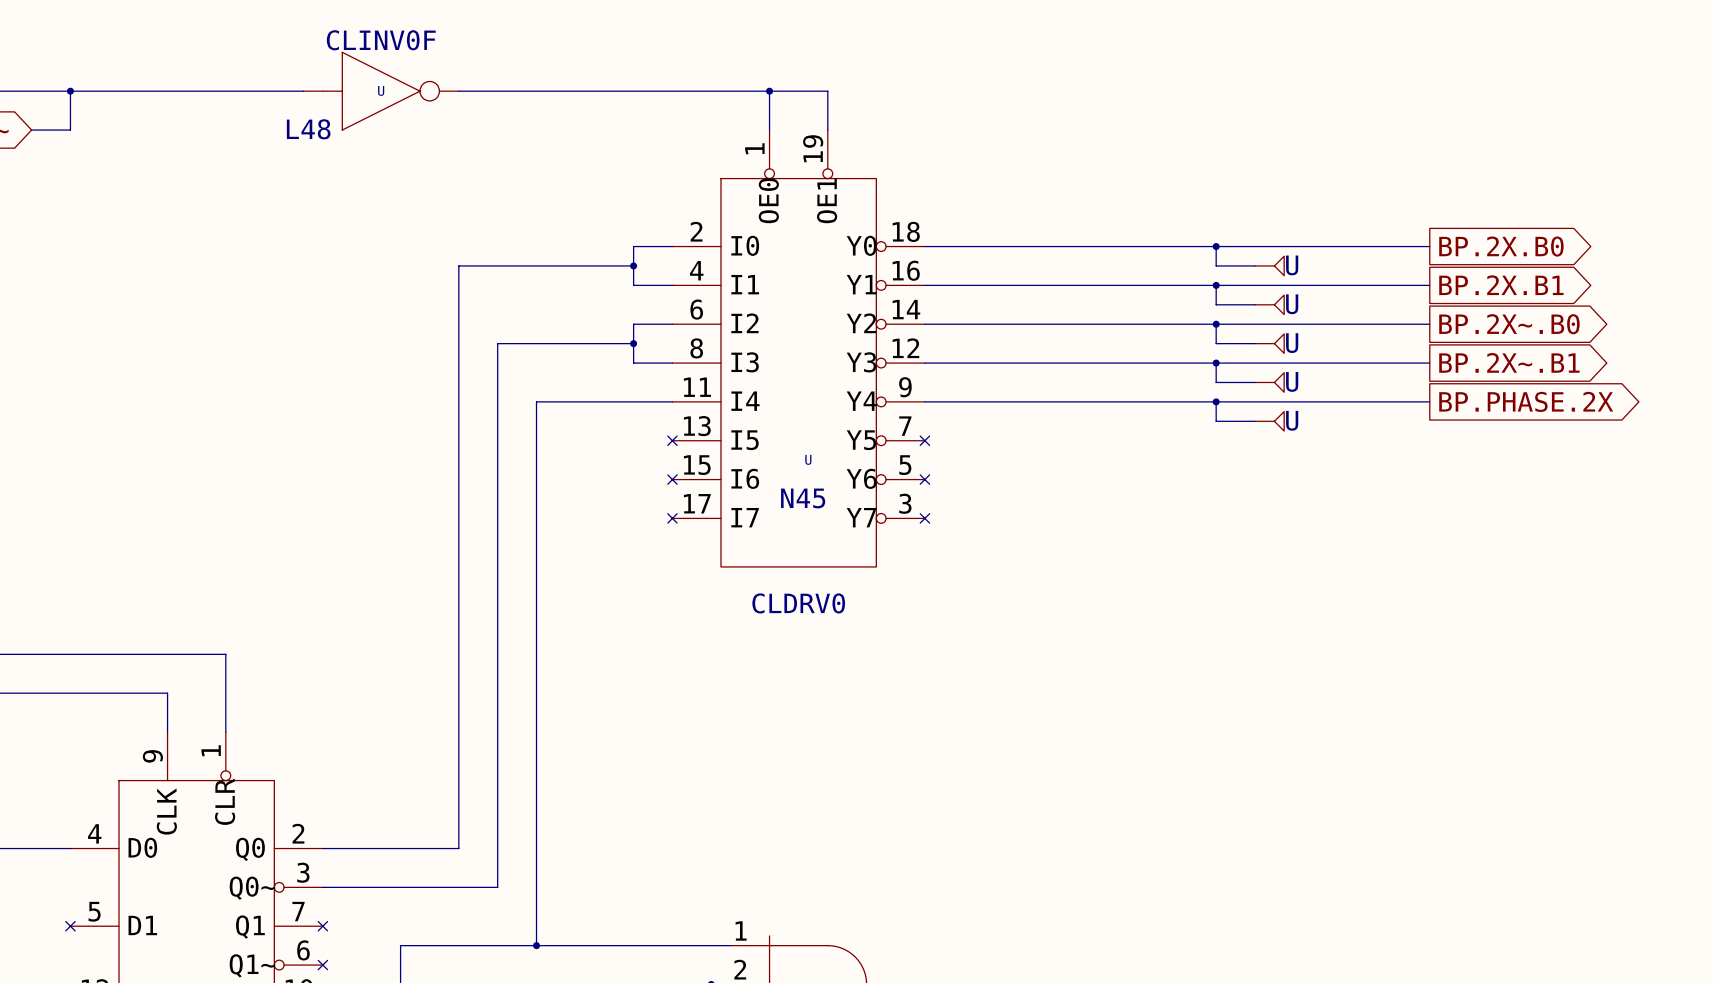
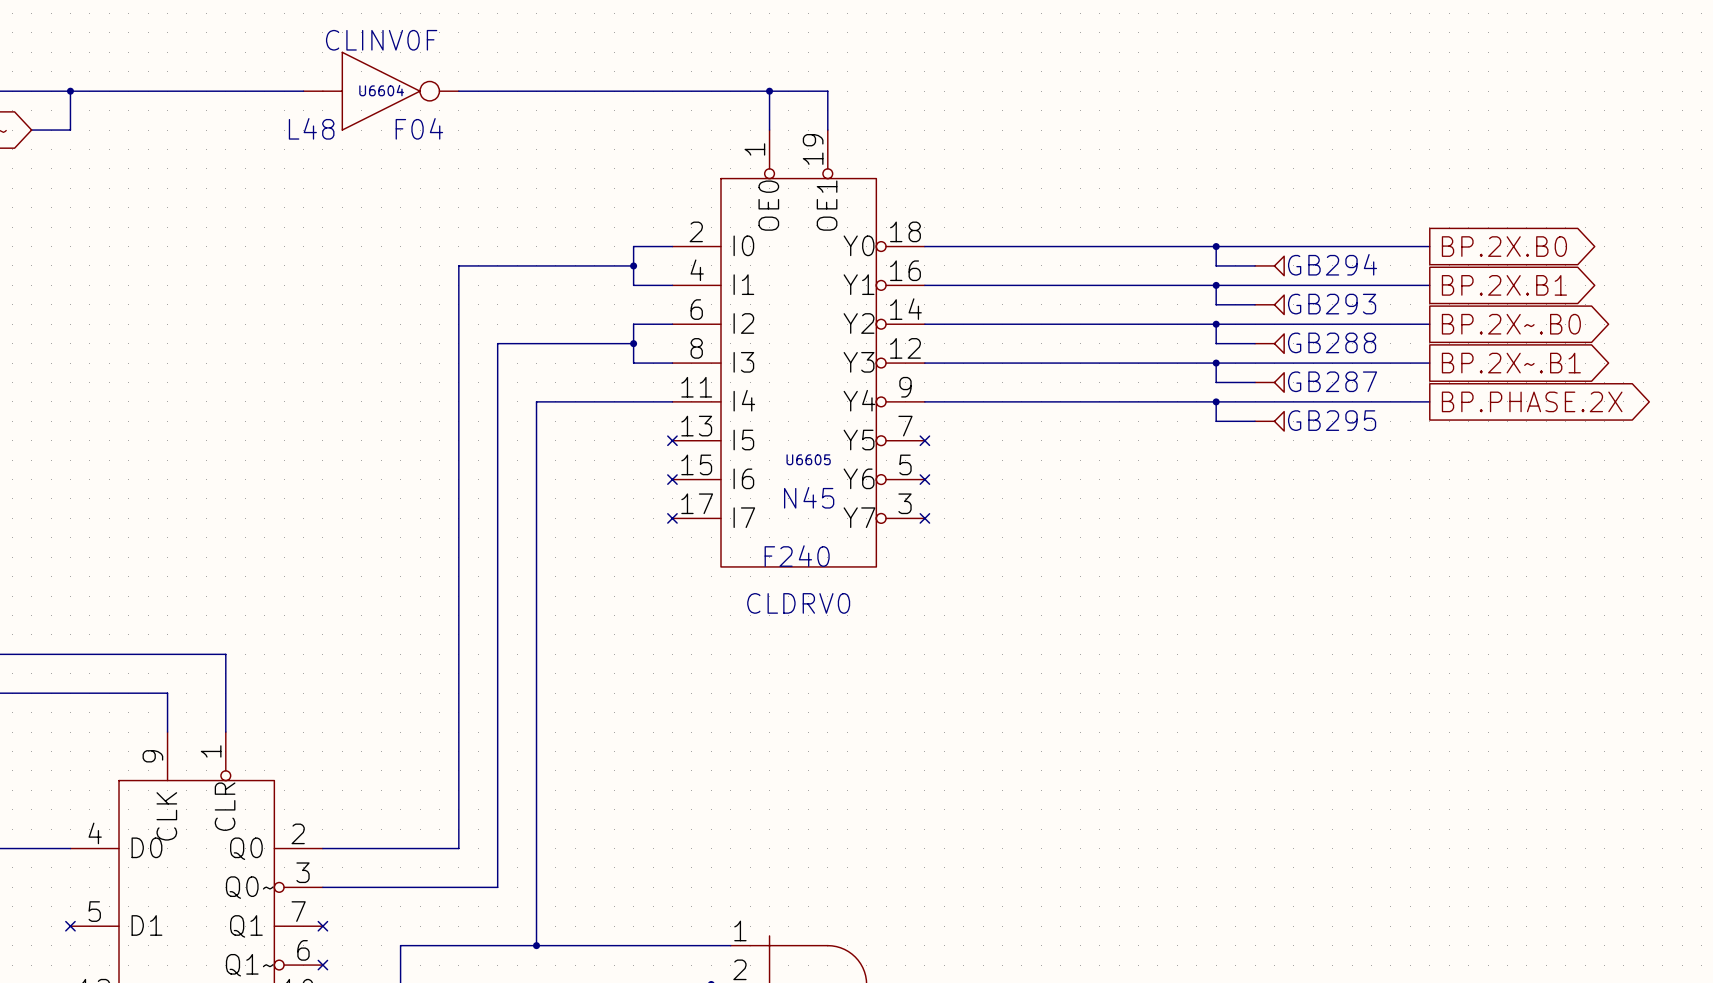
U name: U (381, 90) -> U6604 (381, 90)
U value: none -> F04 (419, 128)
U name: U (1292, 265) -> GB294 (1332, 264)
U name: U (1292, 304) -> GB293 (1332, 304)
U name: U (1292, 343) -> GB288 (1332, 342)
U name: U (1292, 381) -> GB287 (1332, 381)
U name: U (1292, 420) -> GB295 (1332, 420)
U name: U (808, 459) -> U6605 (808, 459)
U value: none -> F240 (797, 556)

